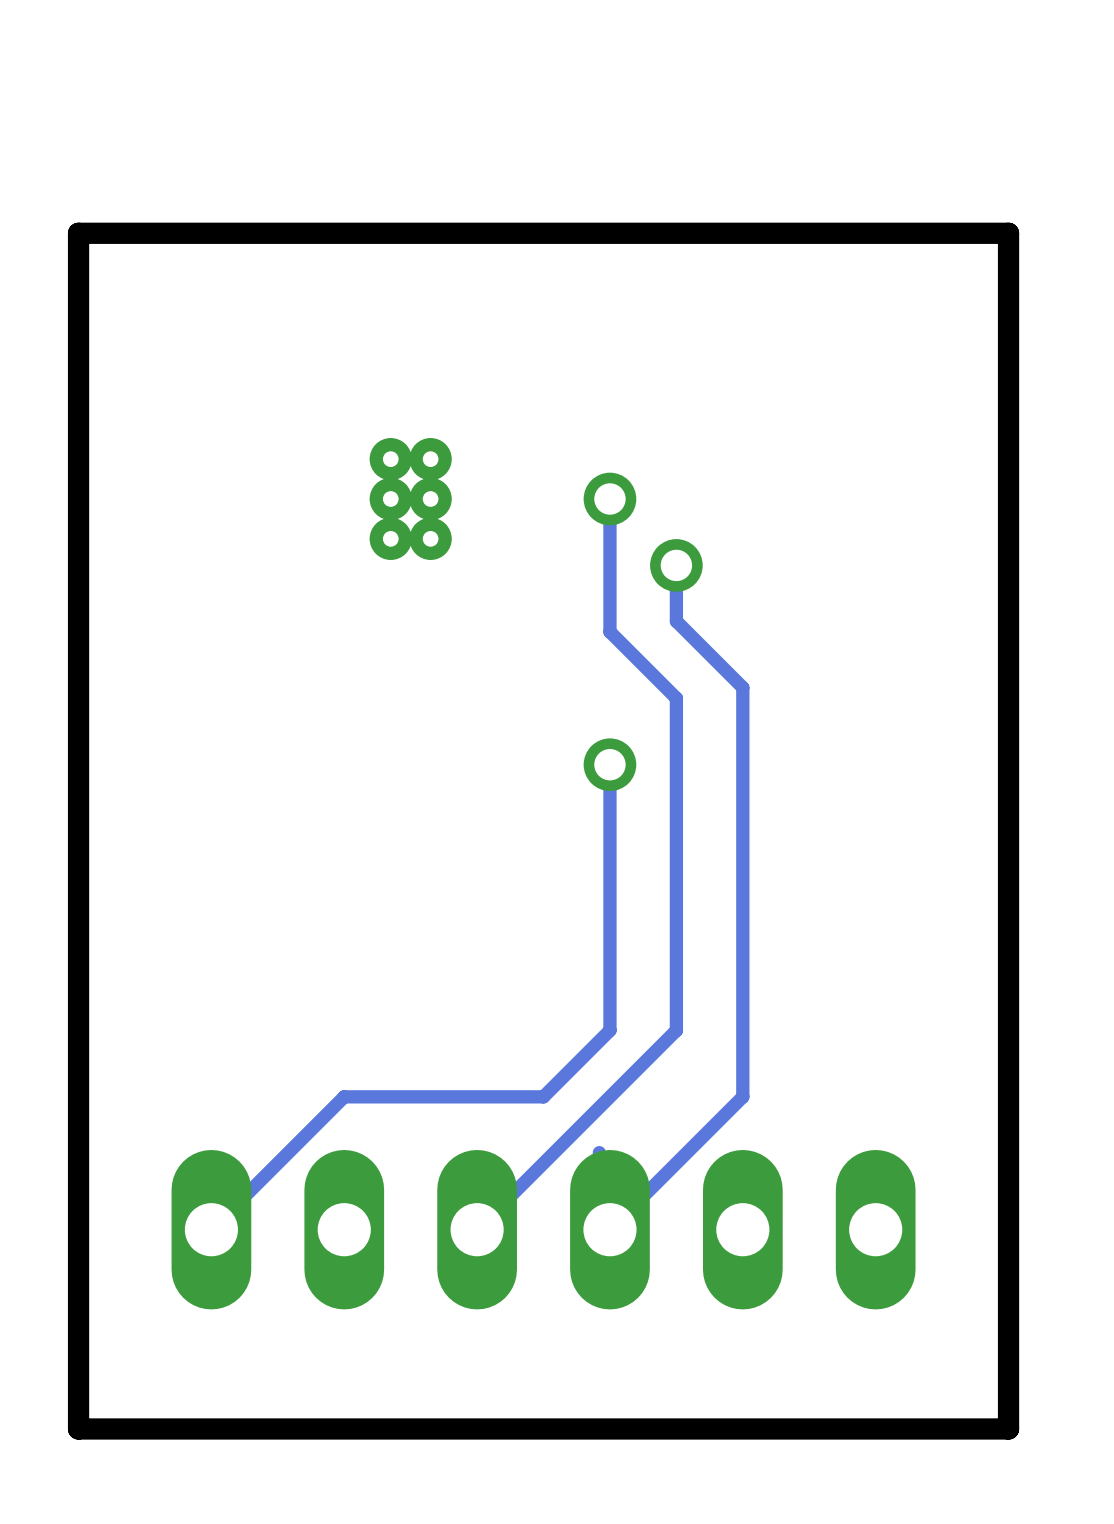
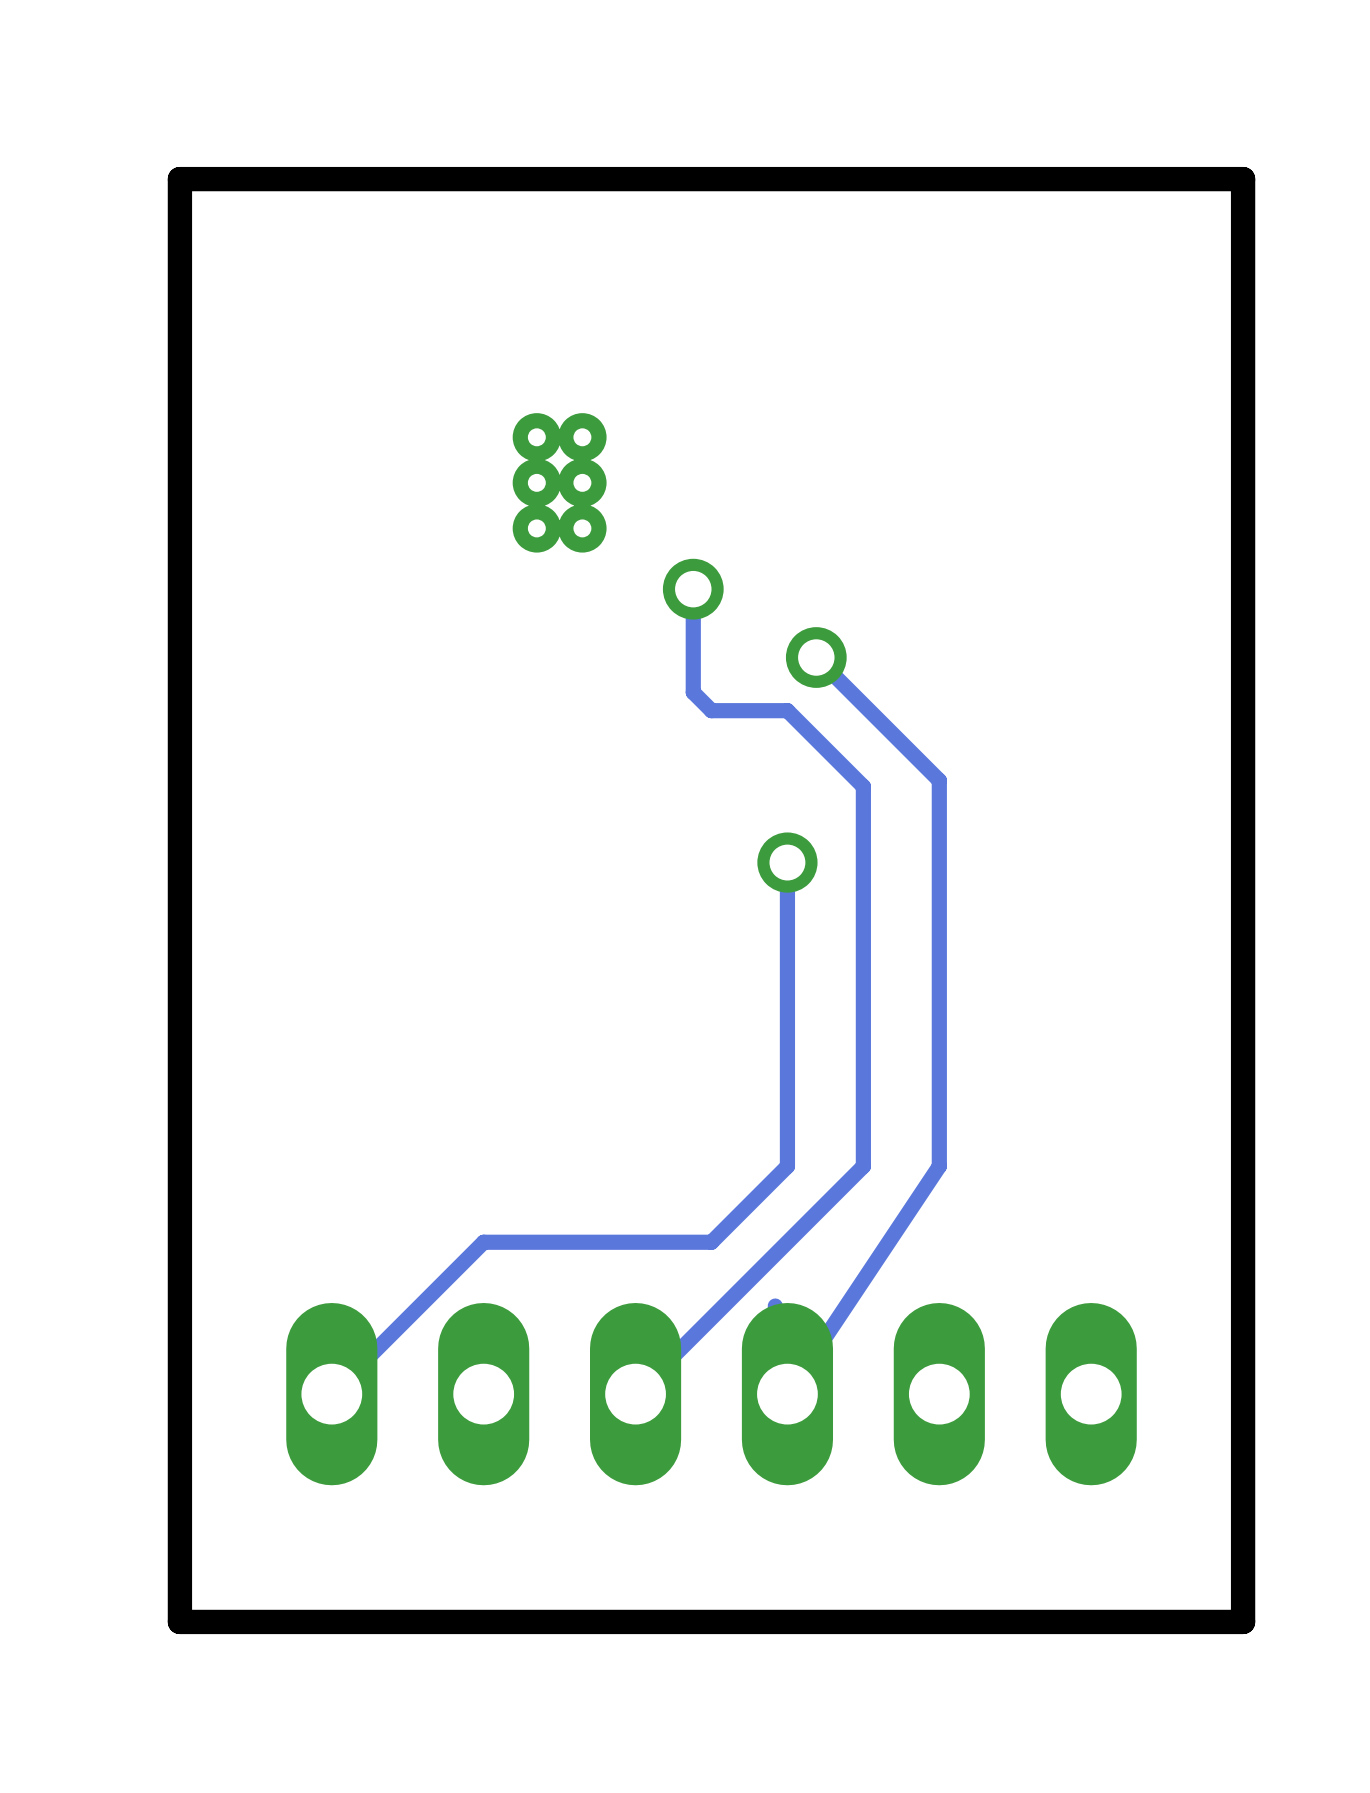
board edge: (1008, 233) (78, 233) -> (1243, 255) (1243, 179) (179, 179) (179, 255)
part position: (410, 499) -> (559, 482)
track: (609, 499) (609, 631) -> (693, 589) (693, 692) (711, 710) (787, 710)
via: (609, 499) -> none
via: none -> (693, 589)
track: (676, 565) (676, 621) (742, 687) (742, 692) -> (816, 657) (939, 780)
via position: (676, 565) -> (816, 657)
track: (742, 1030) (742, 1096) (609, 1229) -> (939, 1166) (787, 1394)

